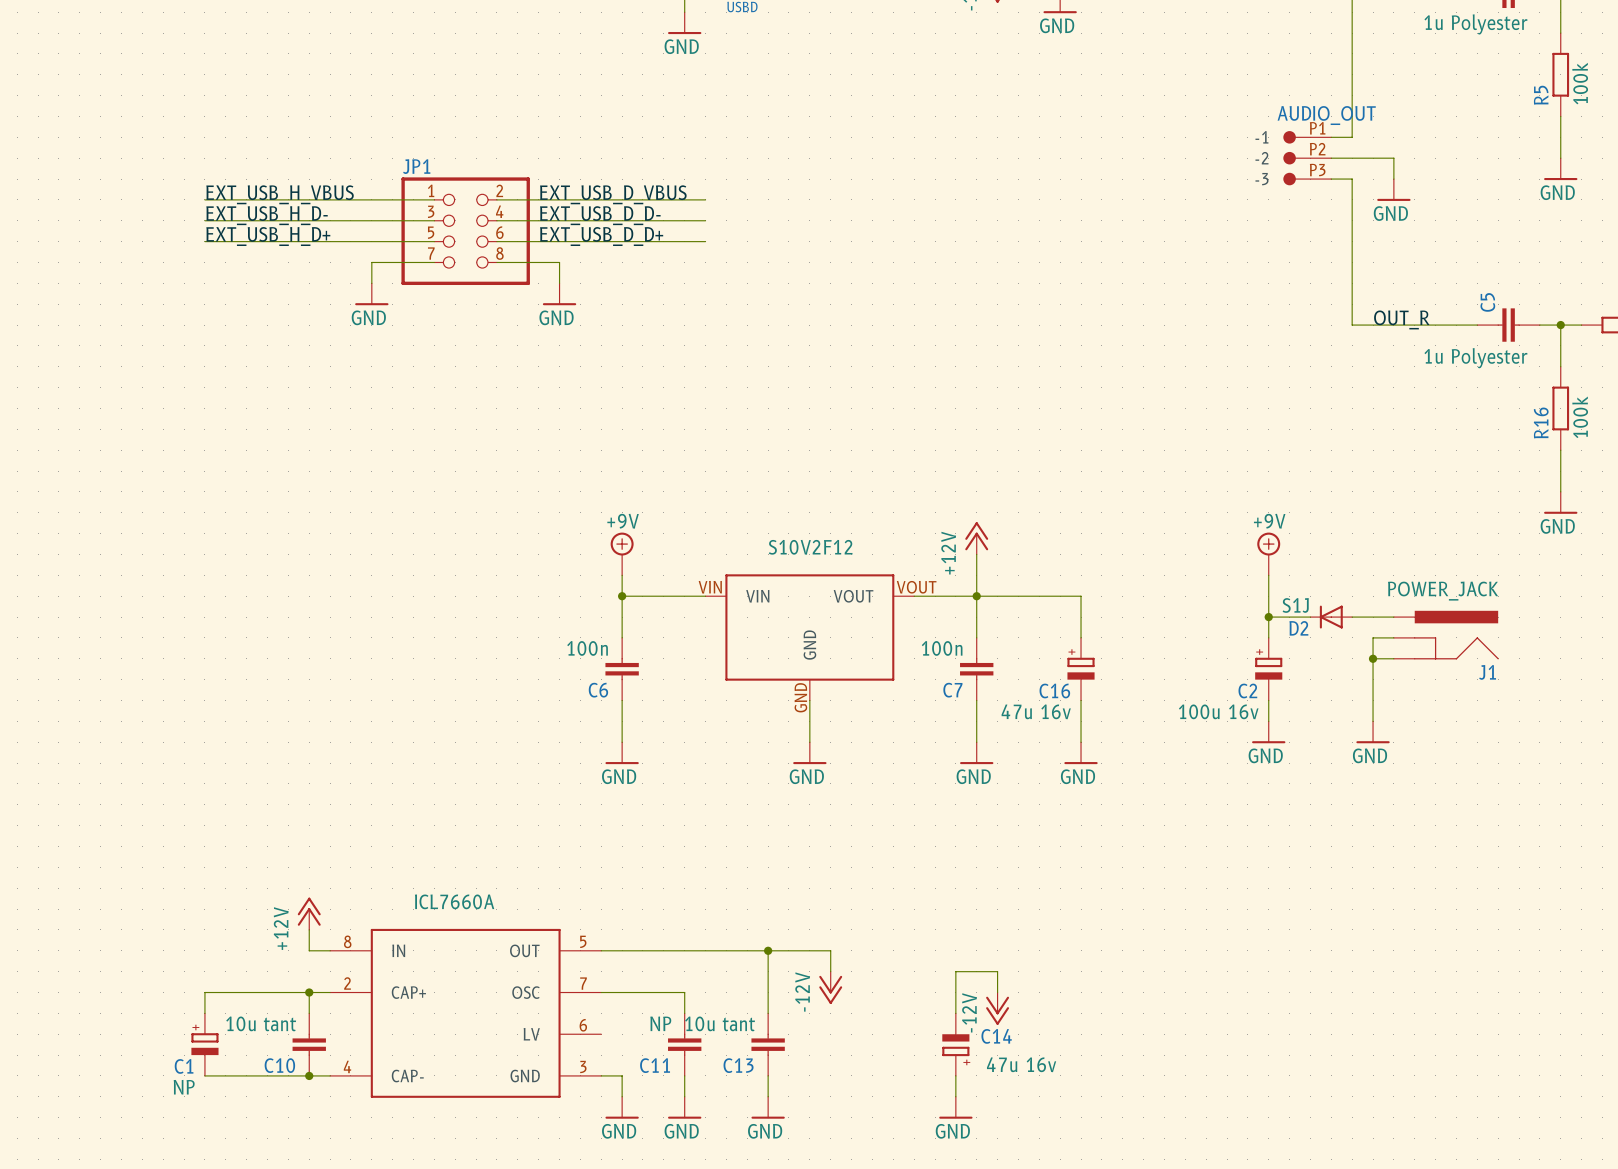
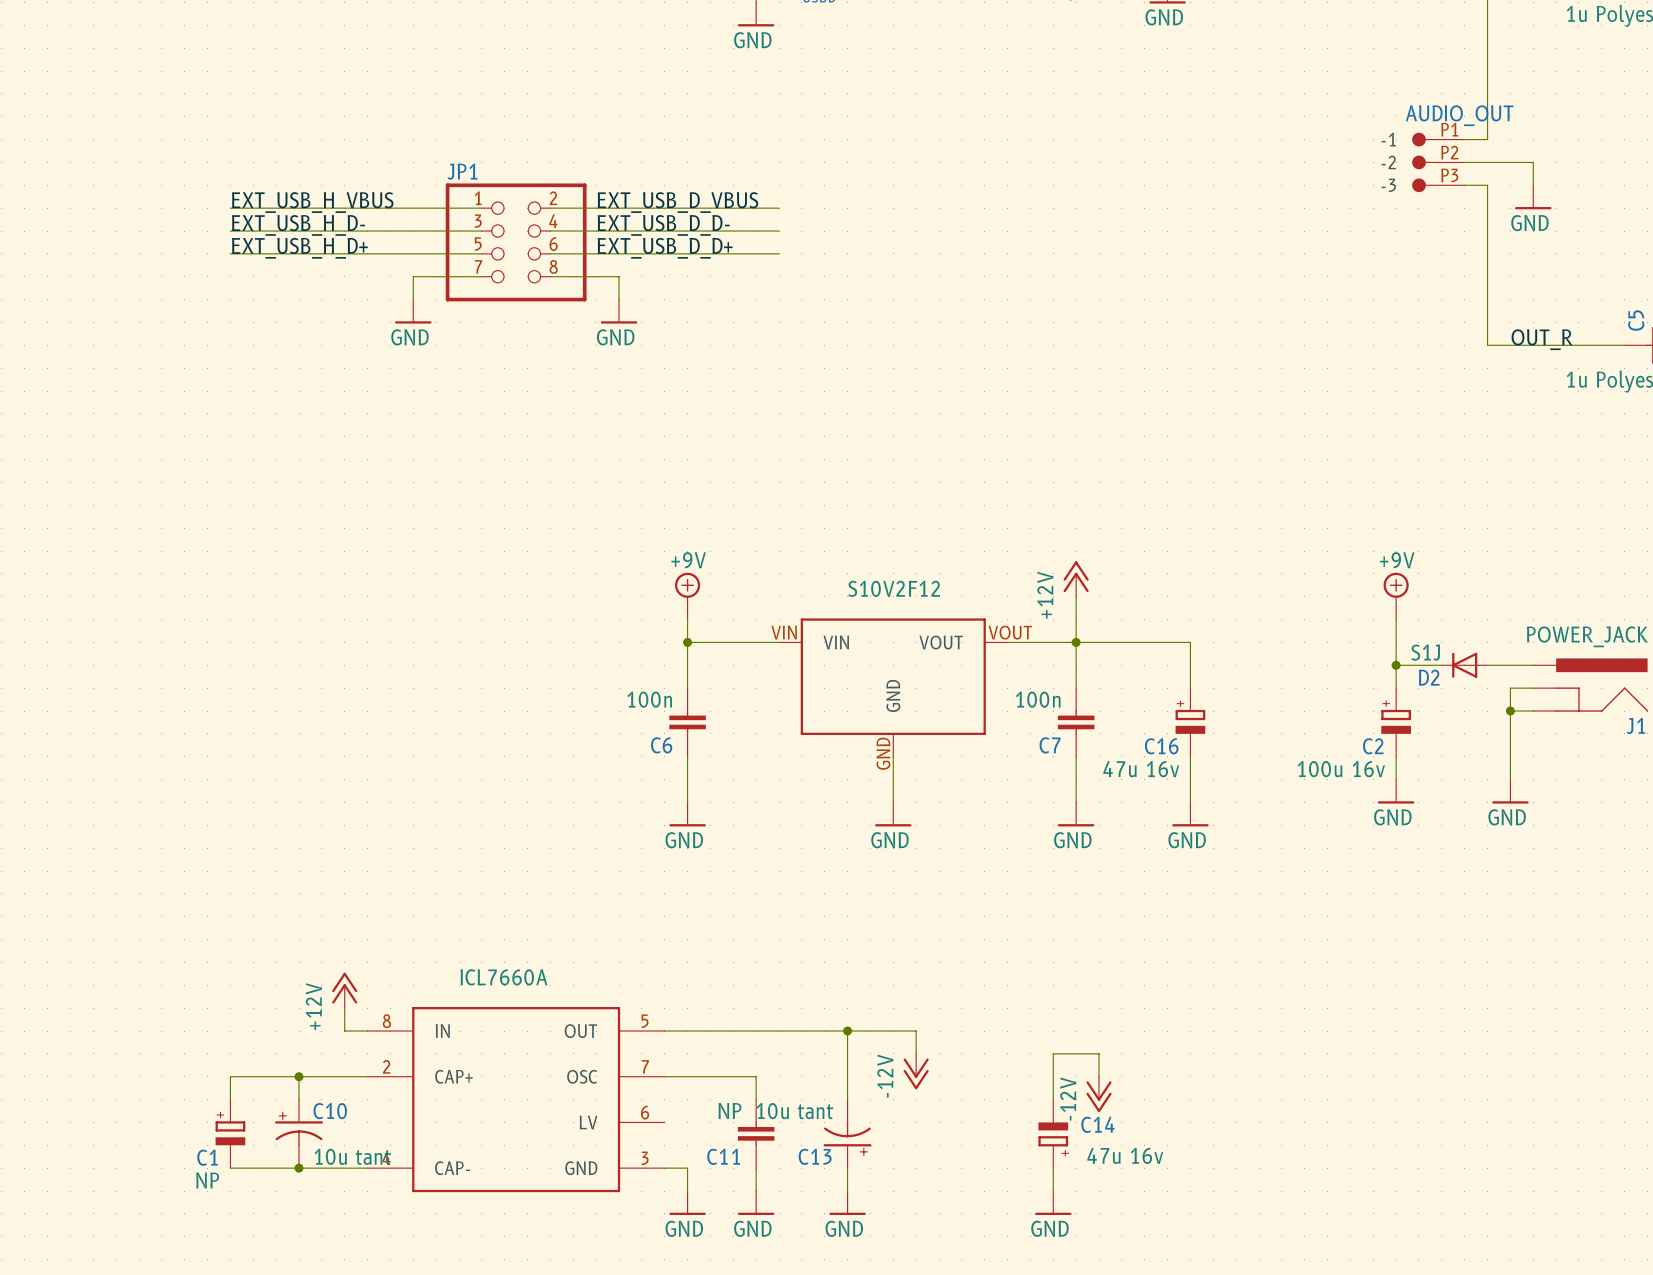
wire: (309, 992) (309, 1013) -> (299, 1076) (299, 1099)
junction position: (309, 992) -> (299, 1076)
C10 symbol: [292, 1013, 326, 1076] -> [275, 1099, 324, 1169]
C13 symbol: [751, 1013, 785, 1076] -> [823, 1099, 872, 1169]
C10 value position: 10u tant (261, 1023) -> 10u tant (352, 1156)
C10 name position: C10 (279, 1065) -> C10 (330, 1111)
junction position: (309, 1075) -> (299, 1168)

